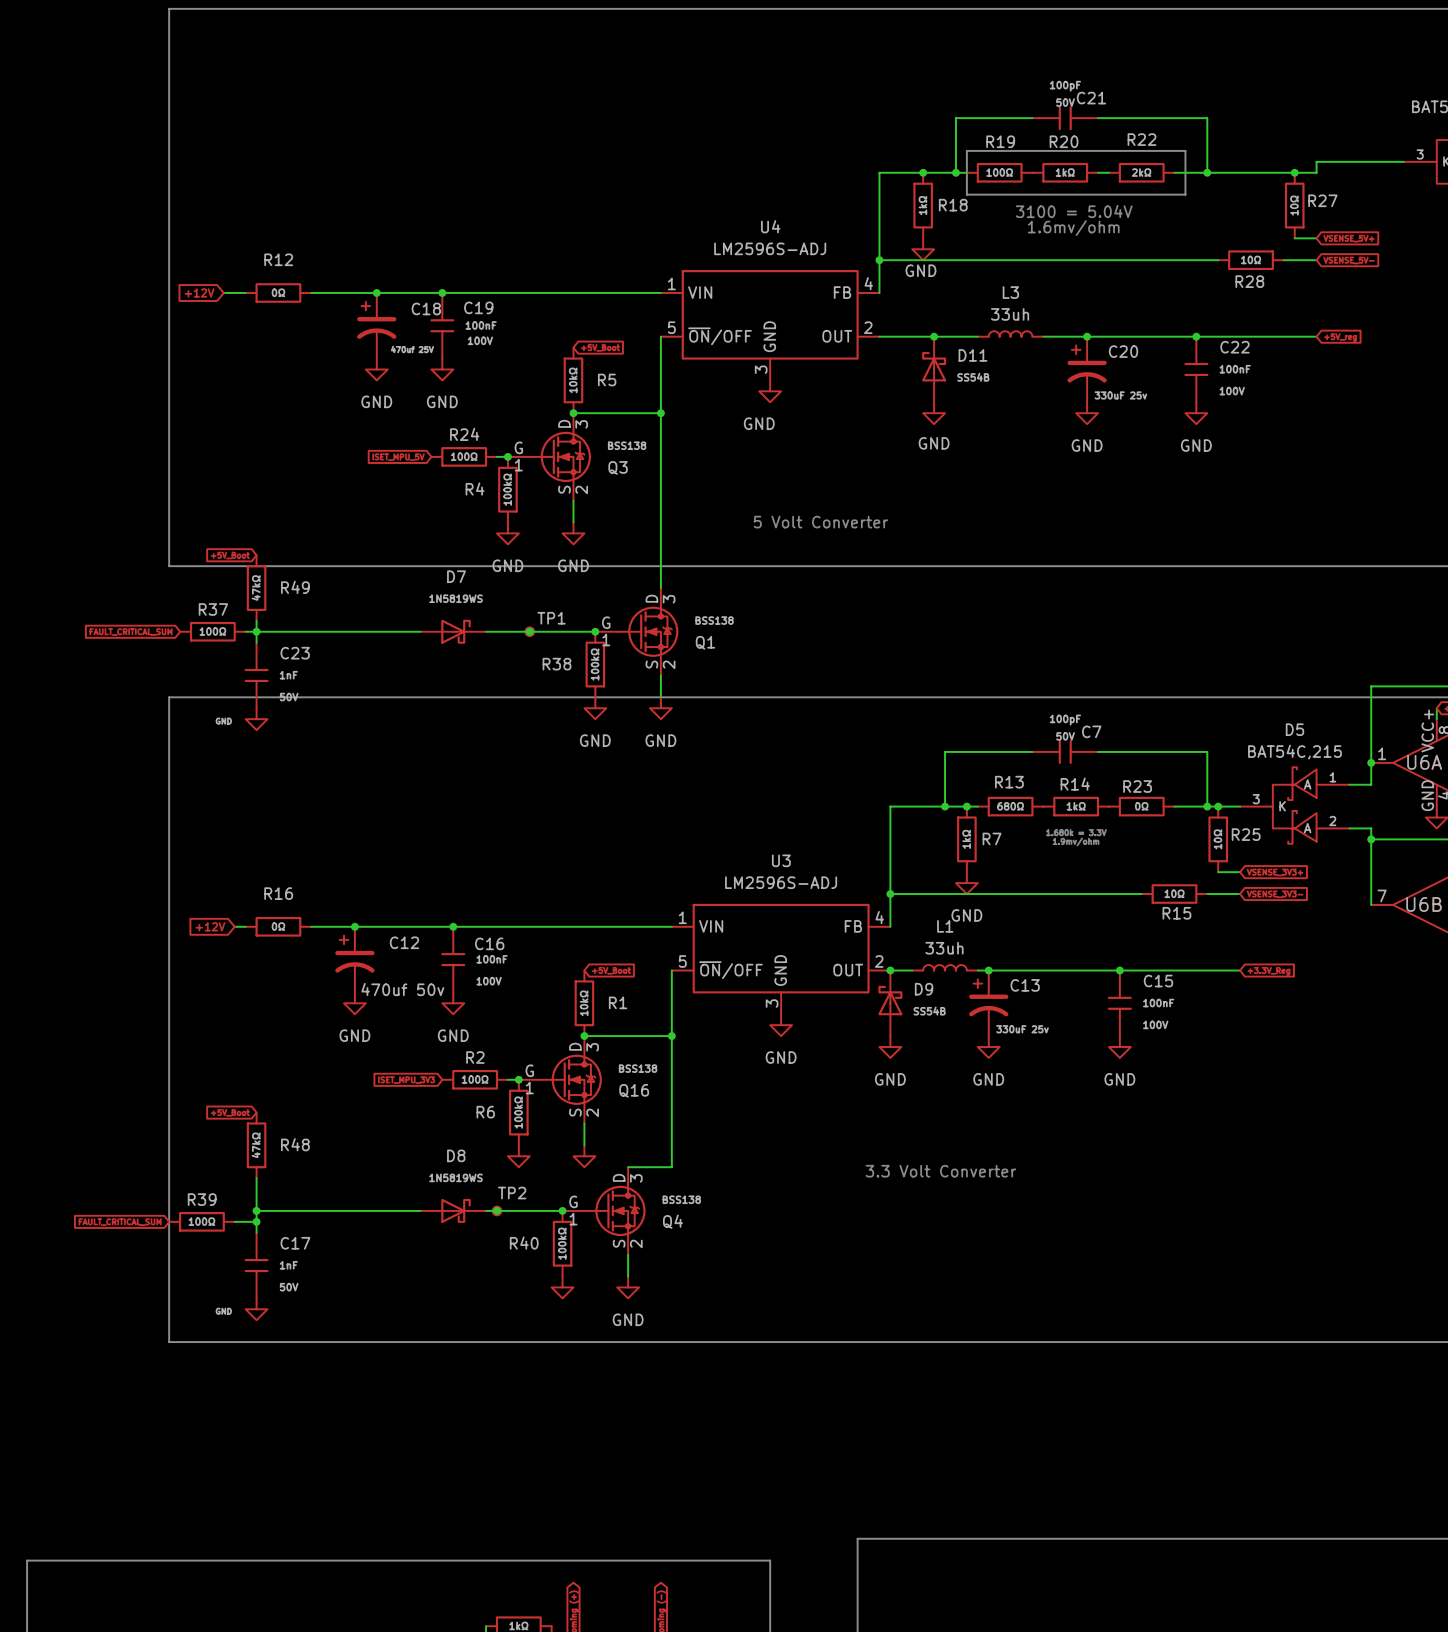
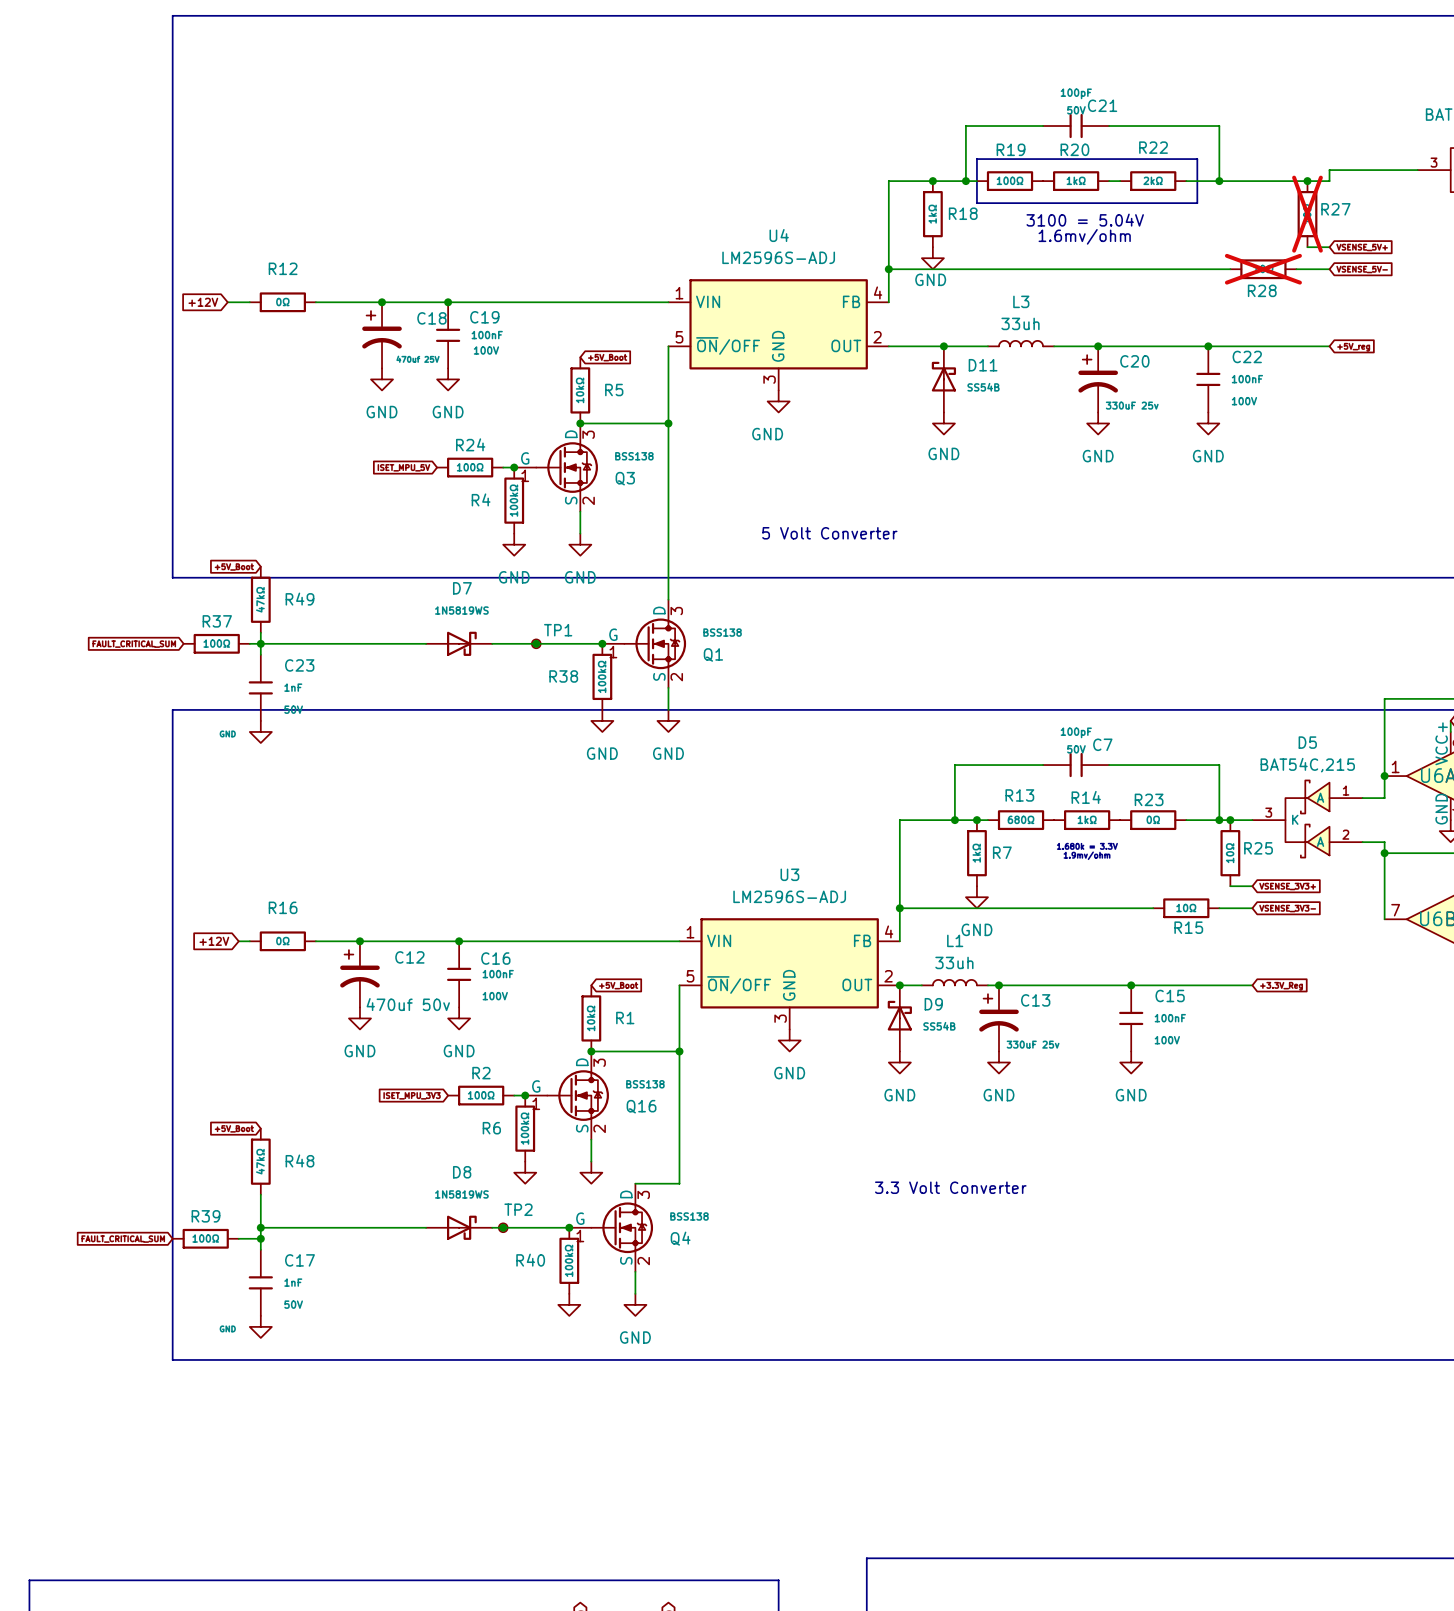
R27 do-not-place cross: none -> (1307, 214)
R28 do-not-place cross: none -> (1263, 269)

